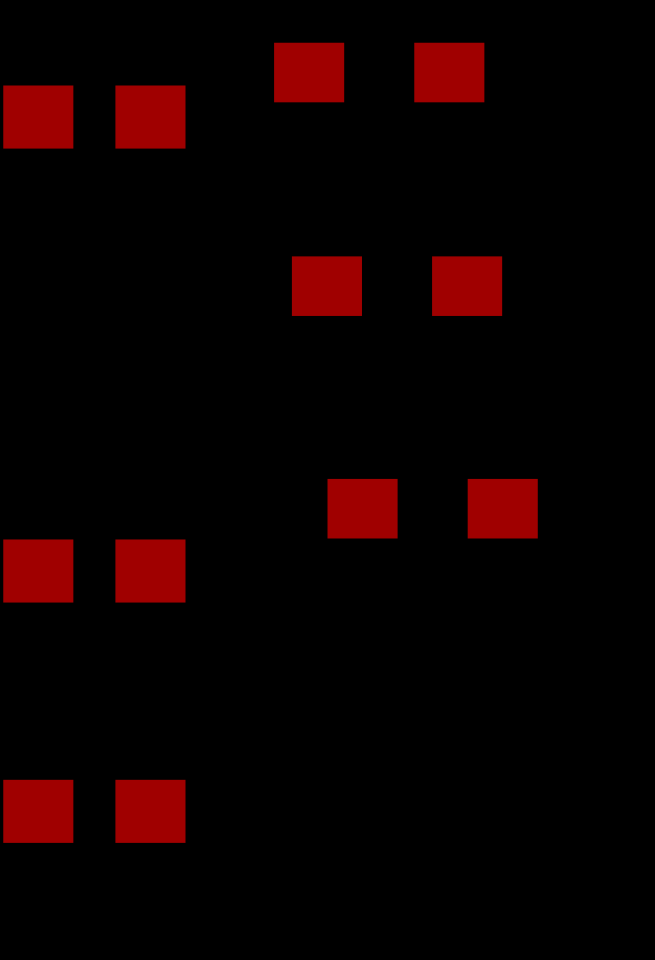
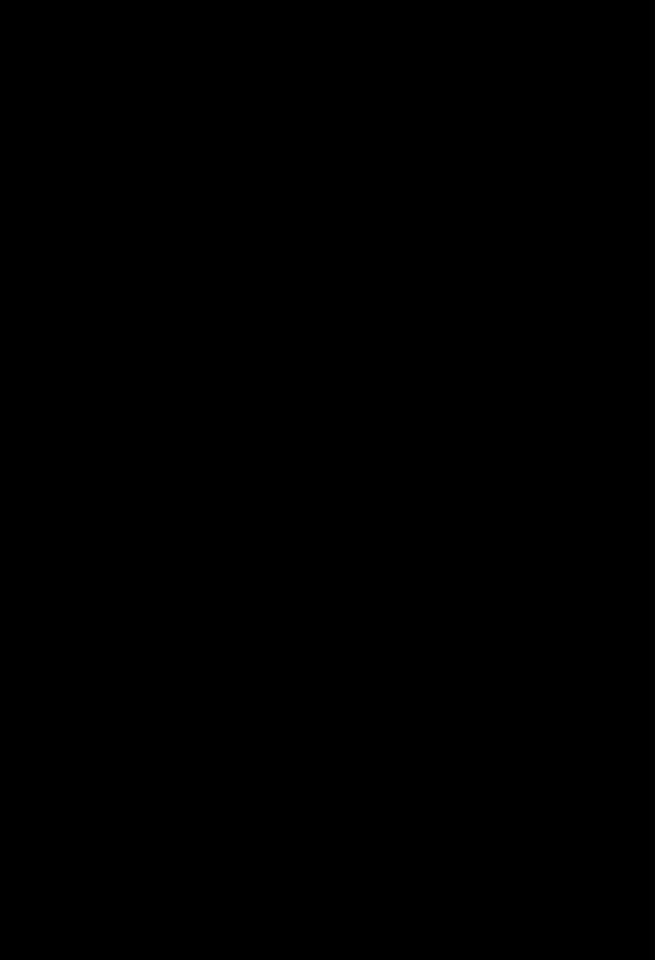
part: (379, 72) -> none
part: (94, 117) -> none
part: (397, 286) -> none
part: (432, 508) -> none
part: (94, 571) -> none
part: (94, 811) -> none

